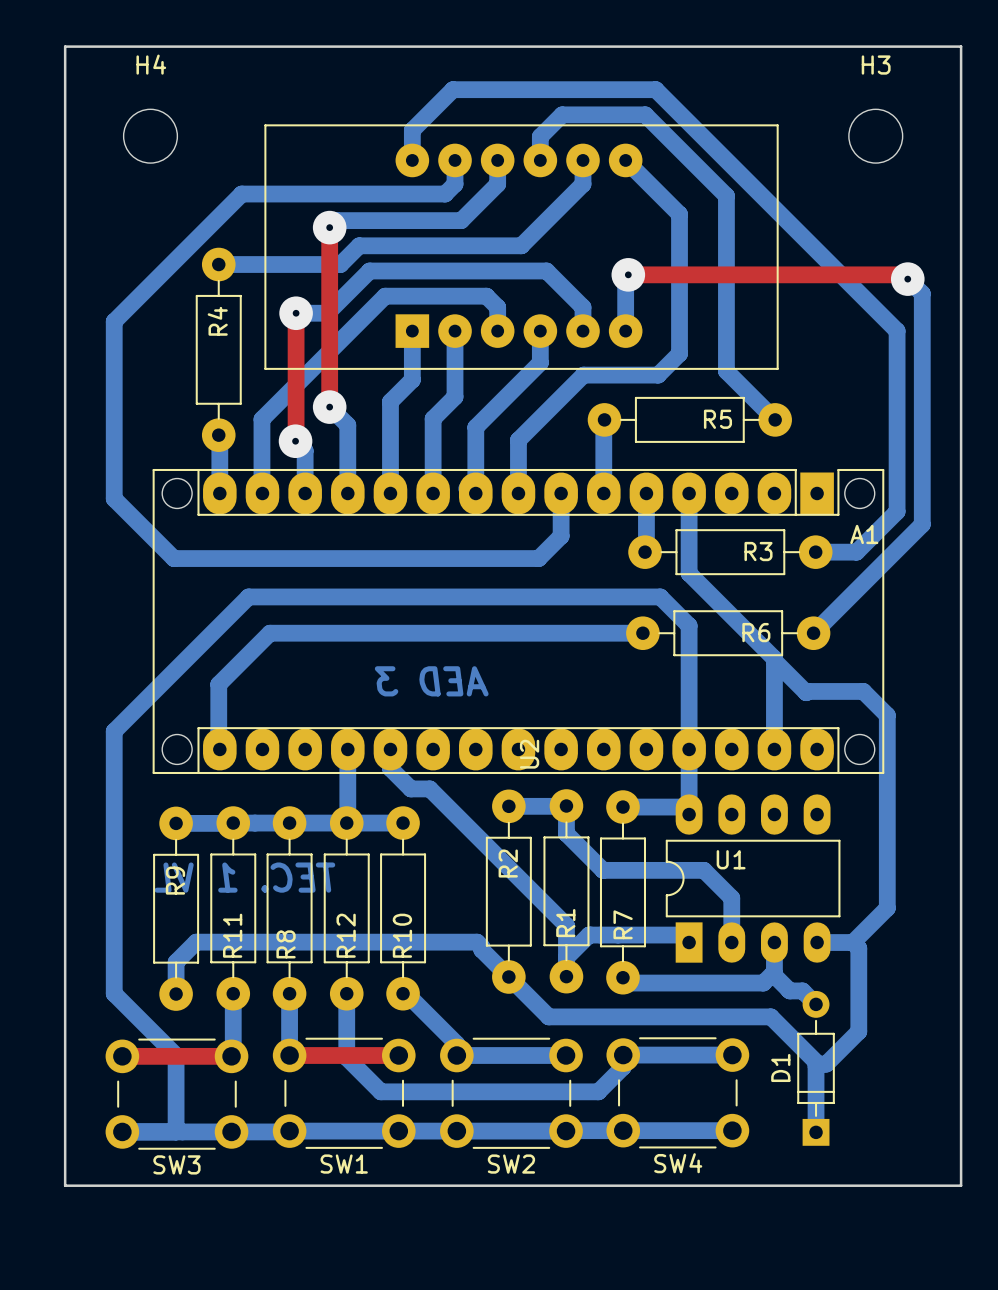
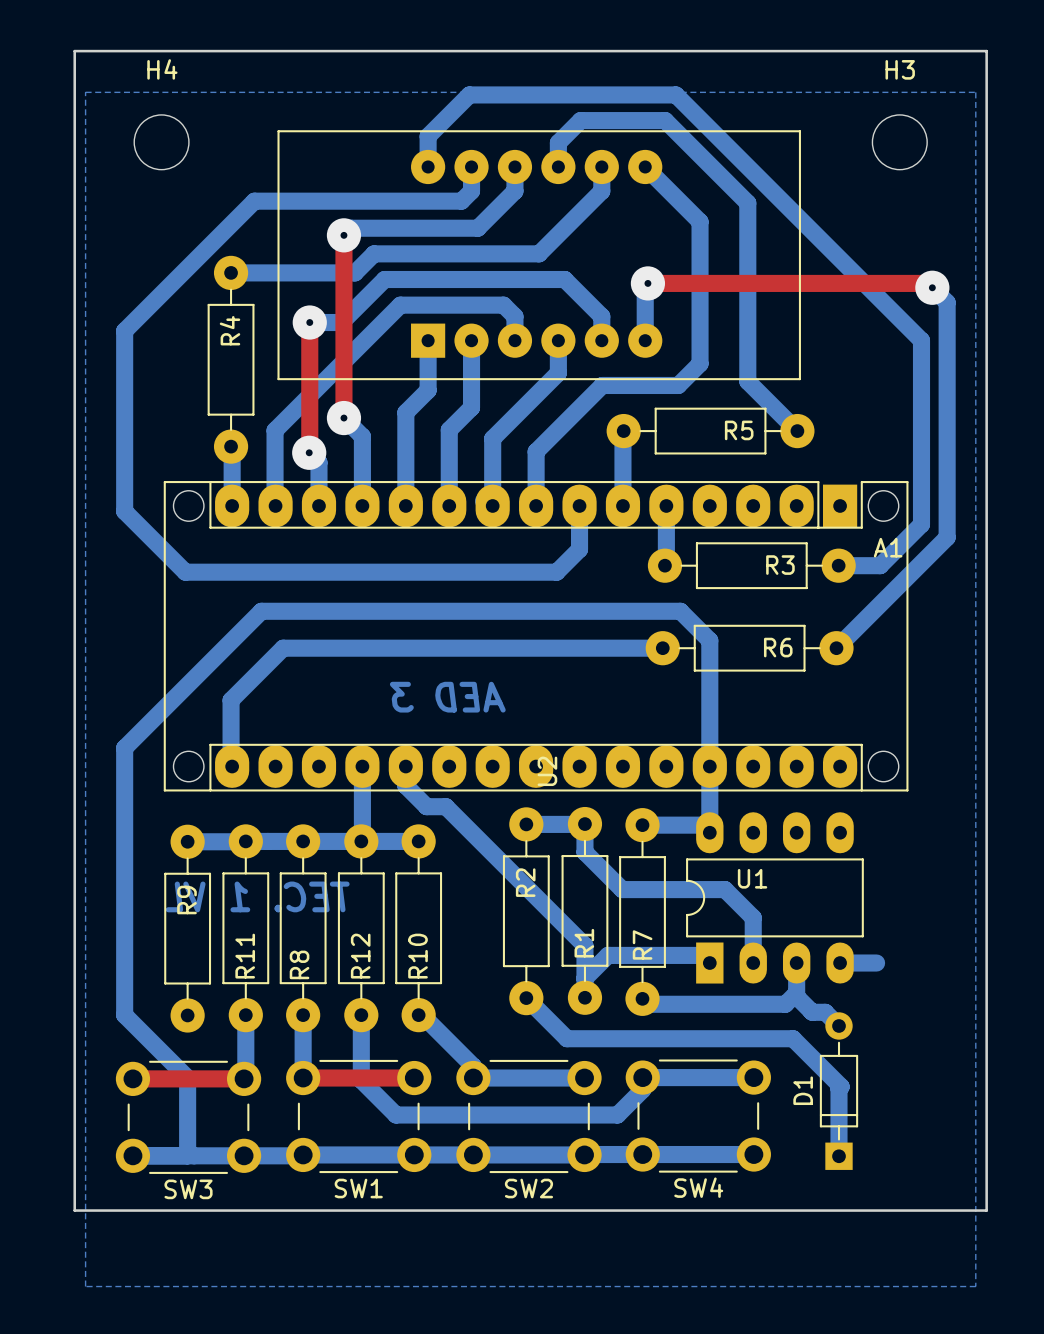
bottom zone outline: none -> (85, 92) (85, 1286) (975, 1286) (975, 92) (85, 92)
bottom track: (689, 493) (689, 573) (774, 658) (774, 749) -> none
bottom track: (774, 660) (806, 692) (863, 691) (887, 715) (887, 908) (852, 942) (858, 948) (858, 1031) (826, 1064) (818, 1064) -> none
bottom track: (508, 976) (481, 949) (481, 946) (477, 942) (196, 942) (176, 962) (176, 994) -> none

